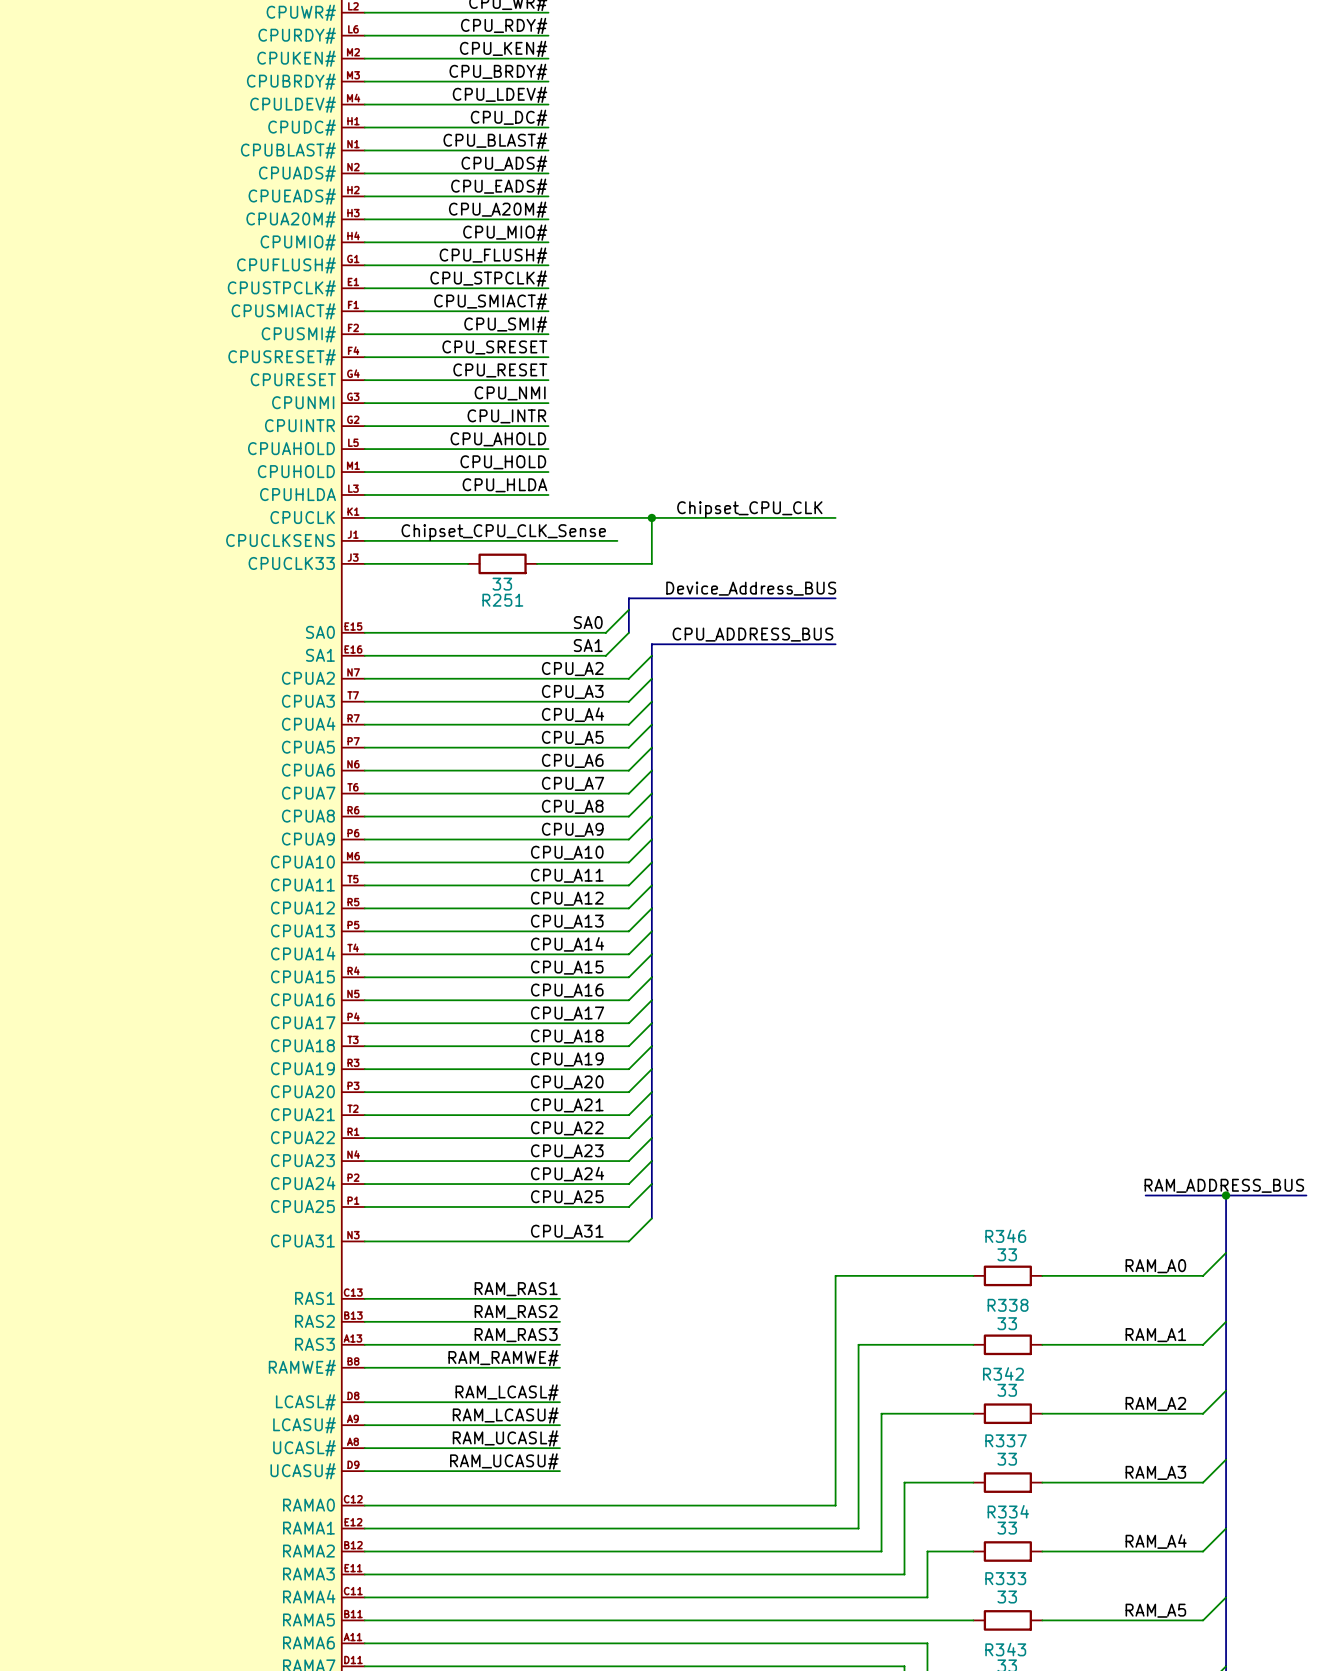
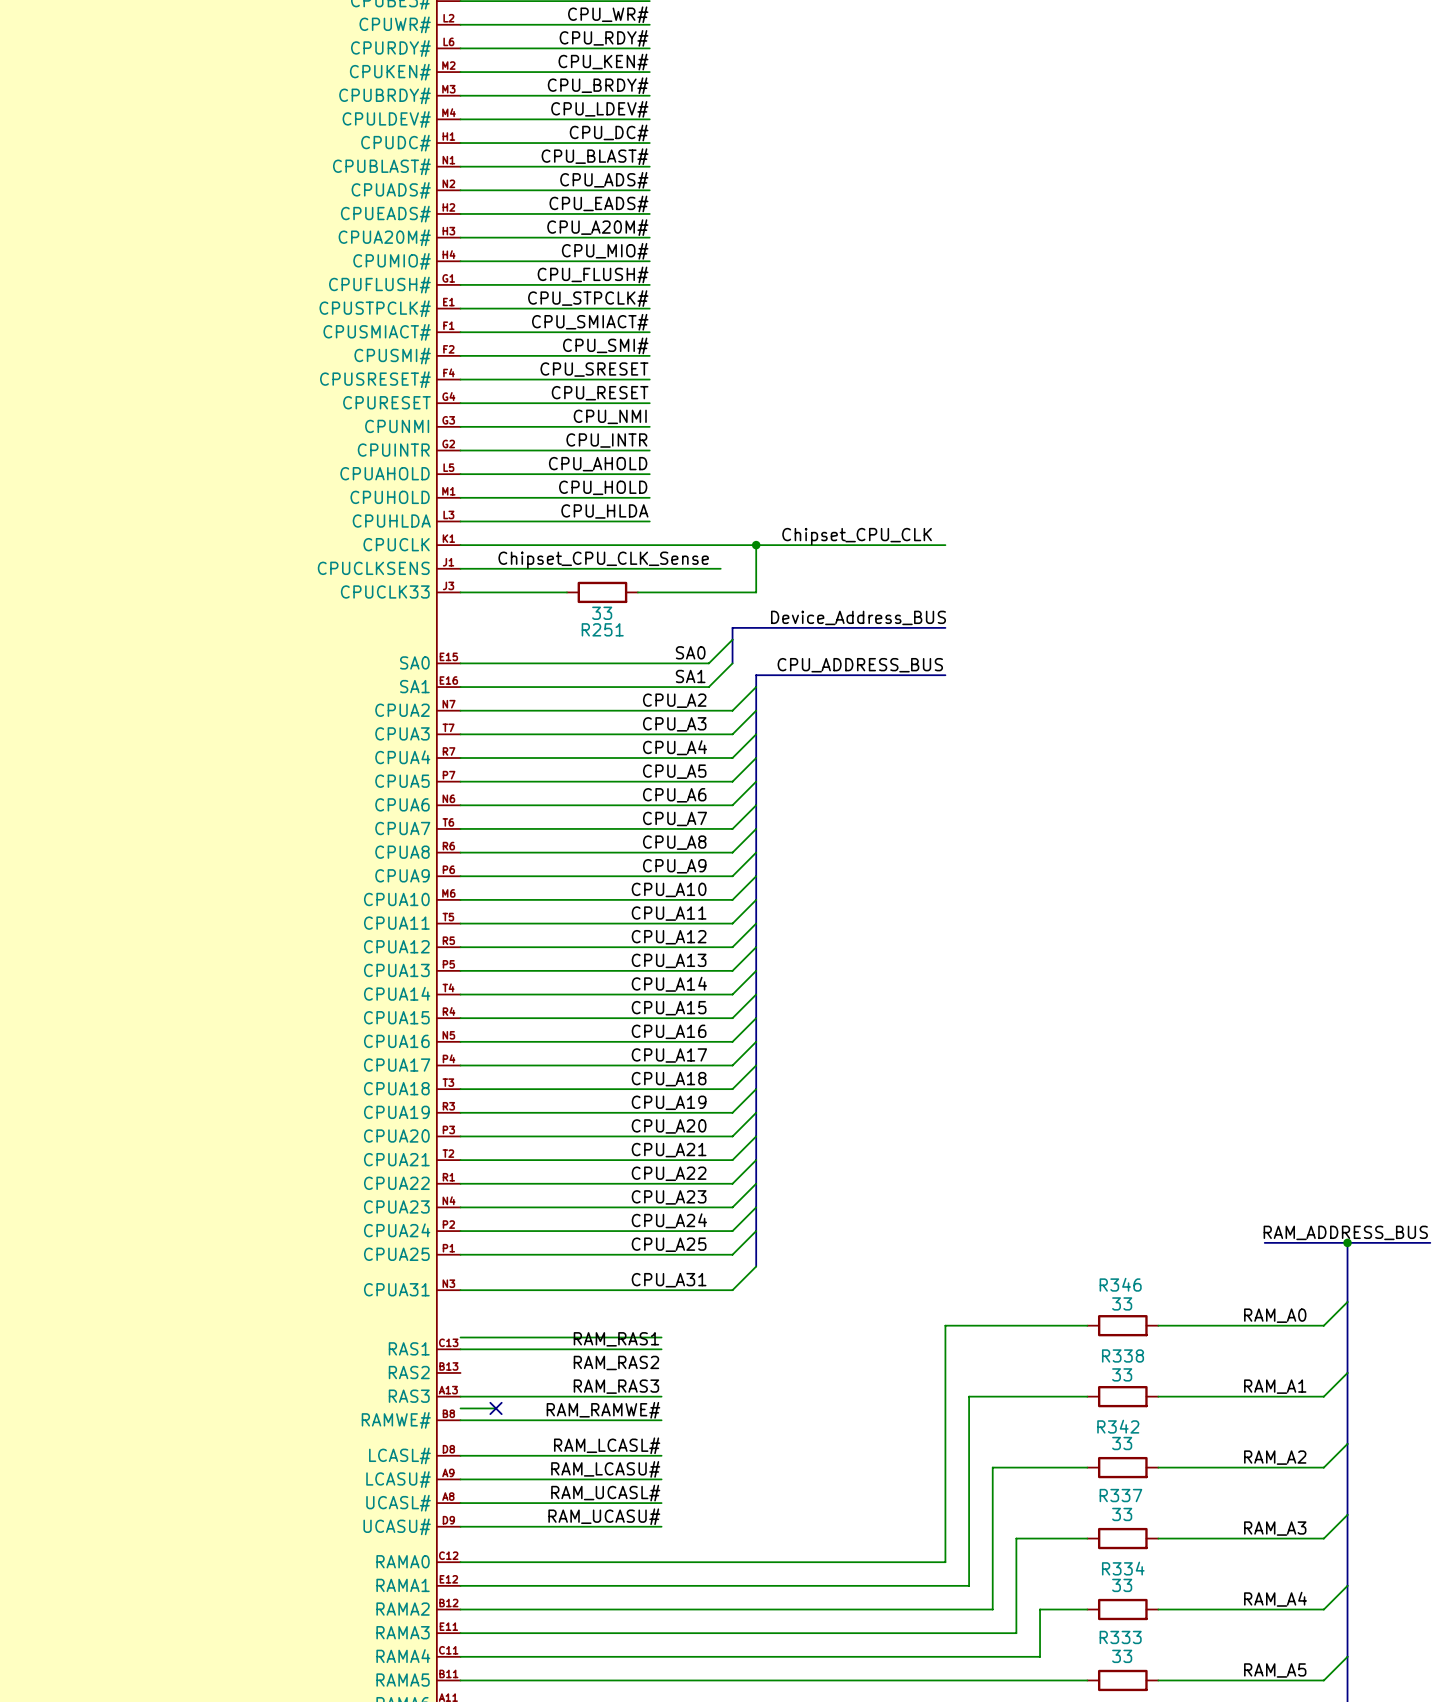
wire: (364, 1321) (559, 1321) -> (460, 1337) (661, 1337)
wire: none -> (460, 1408) (496, 1408)
no-connect mark: none -> (496, 1408)

